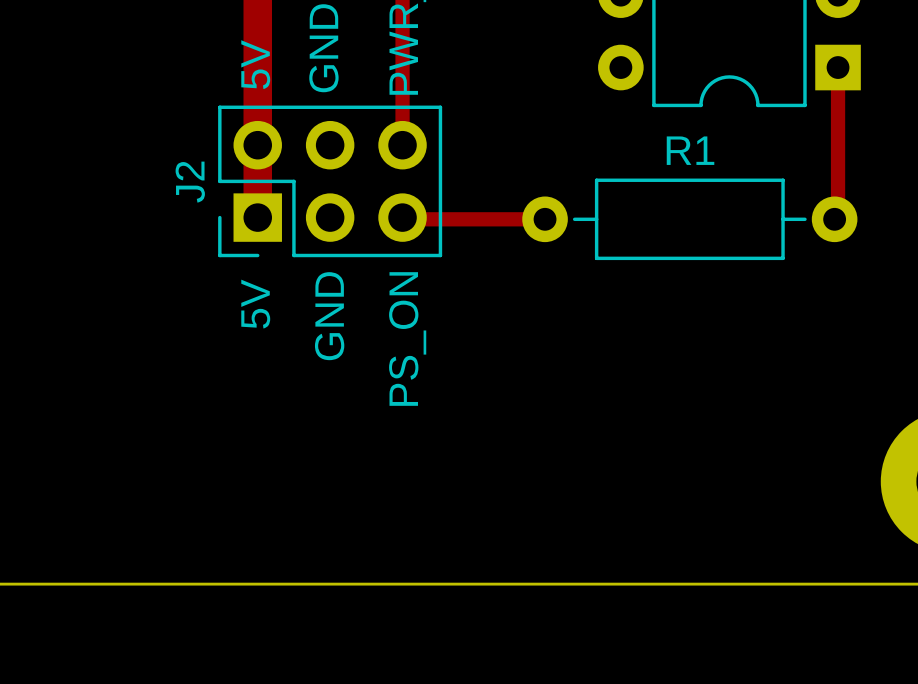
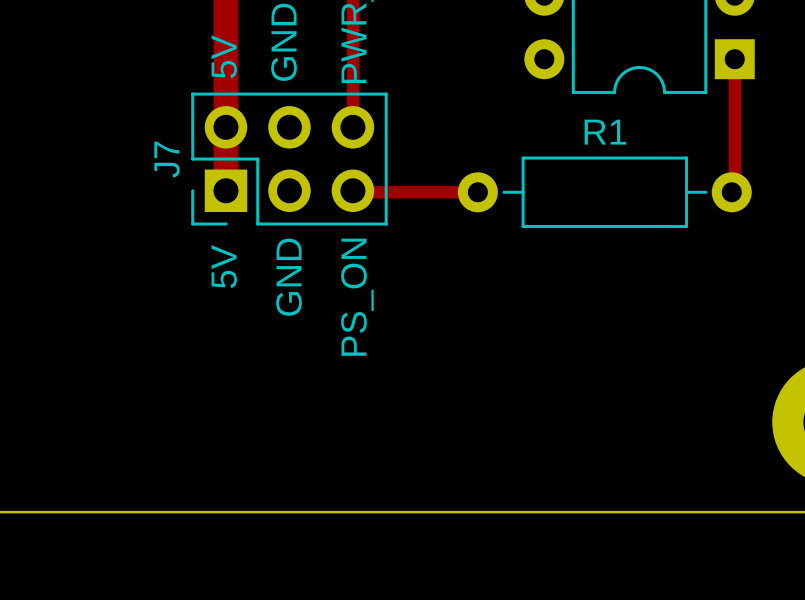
J2 name: J2 (190, 182) -> J7 (167, 159)

